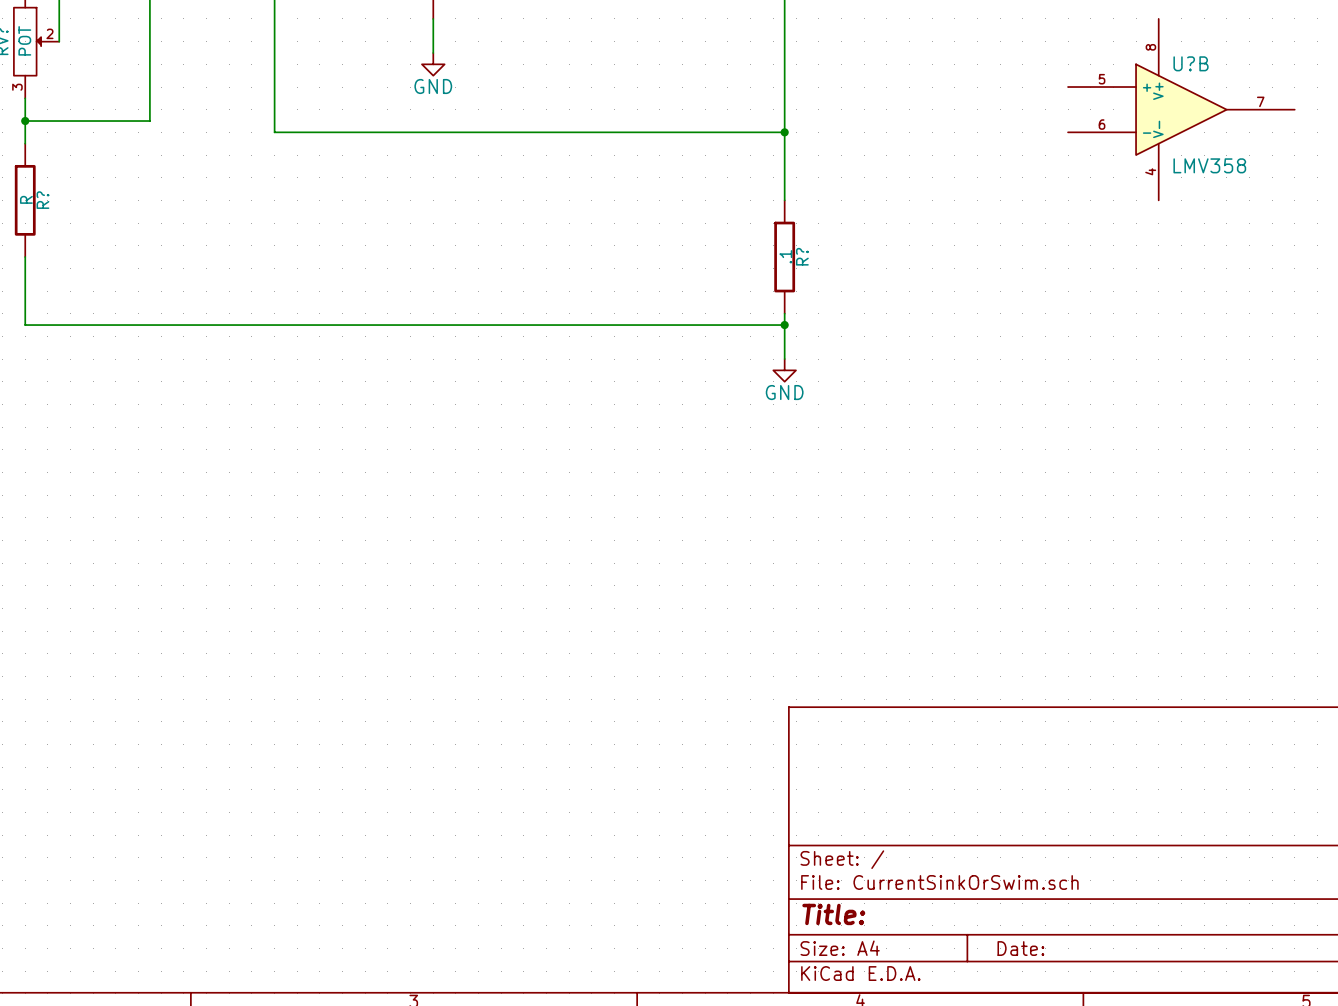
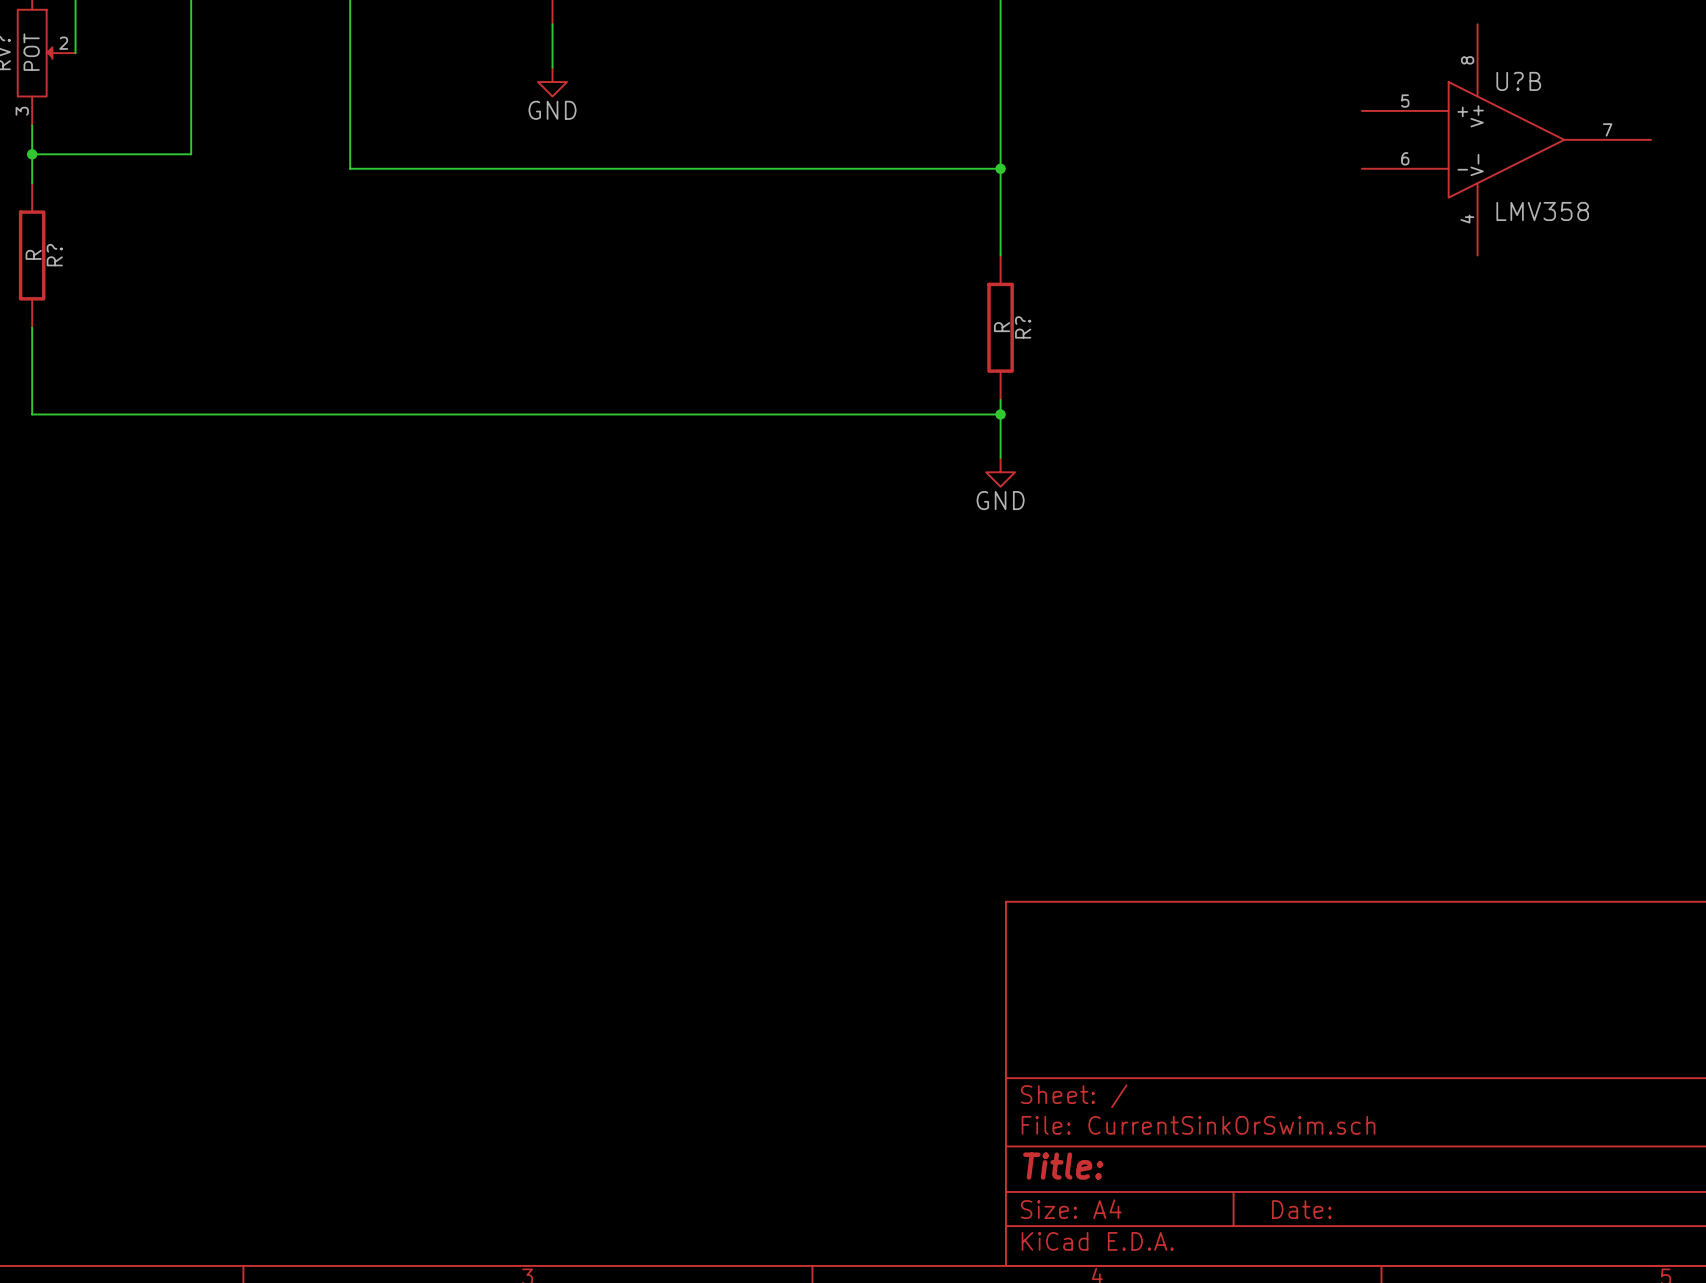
R? value: .1 (785, 256) -> R (1002, 327)

